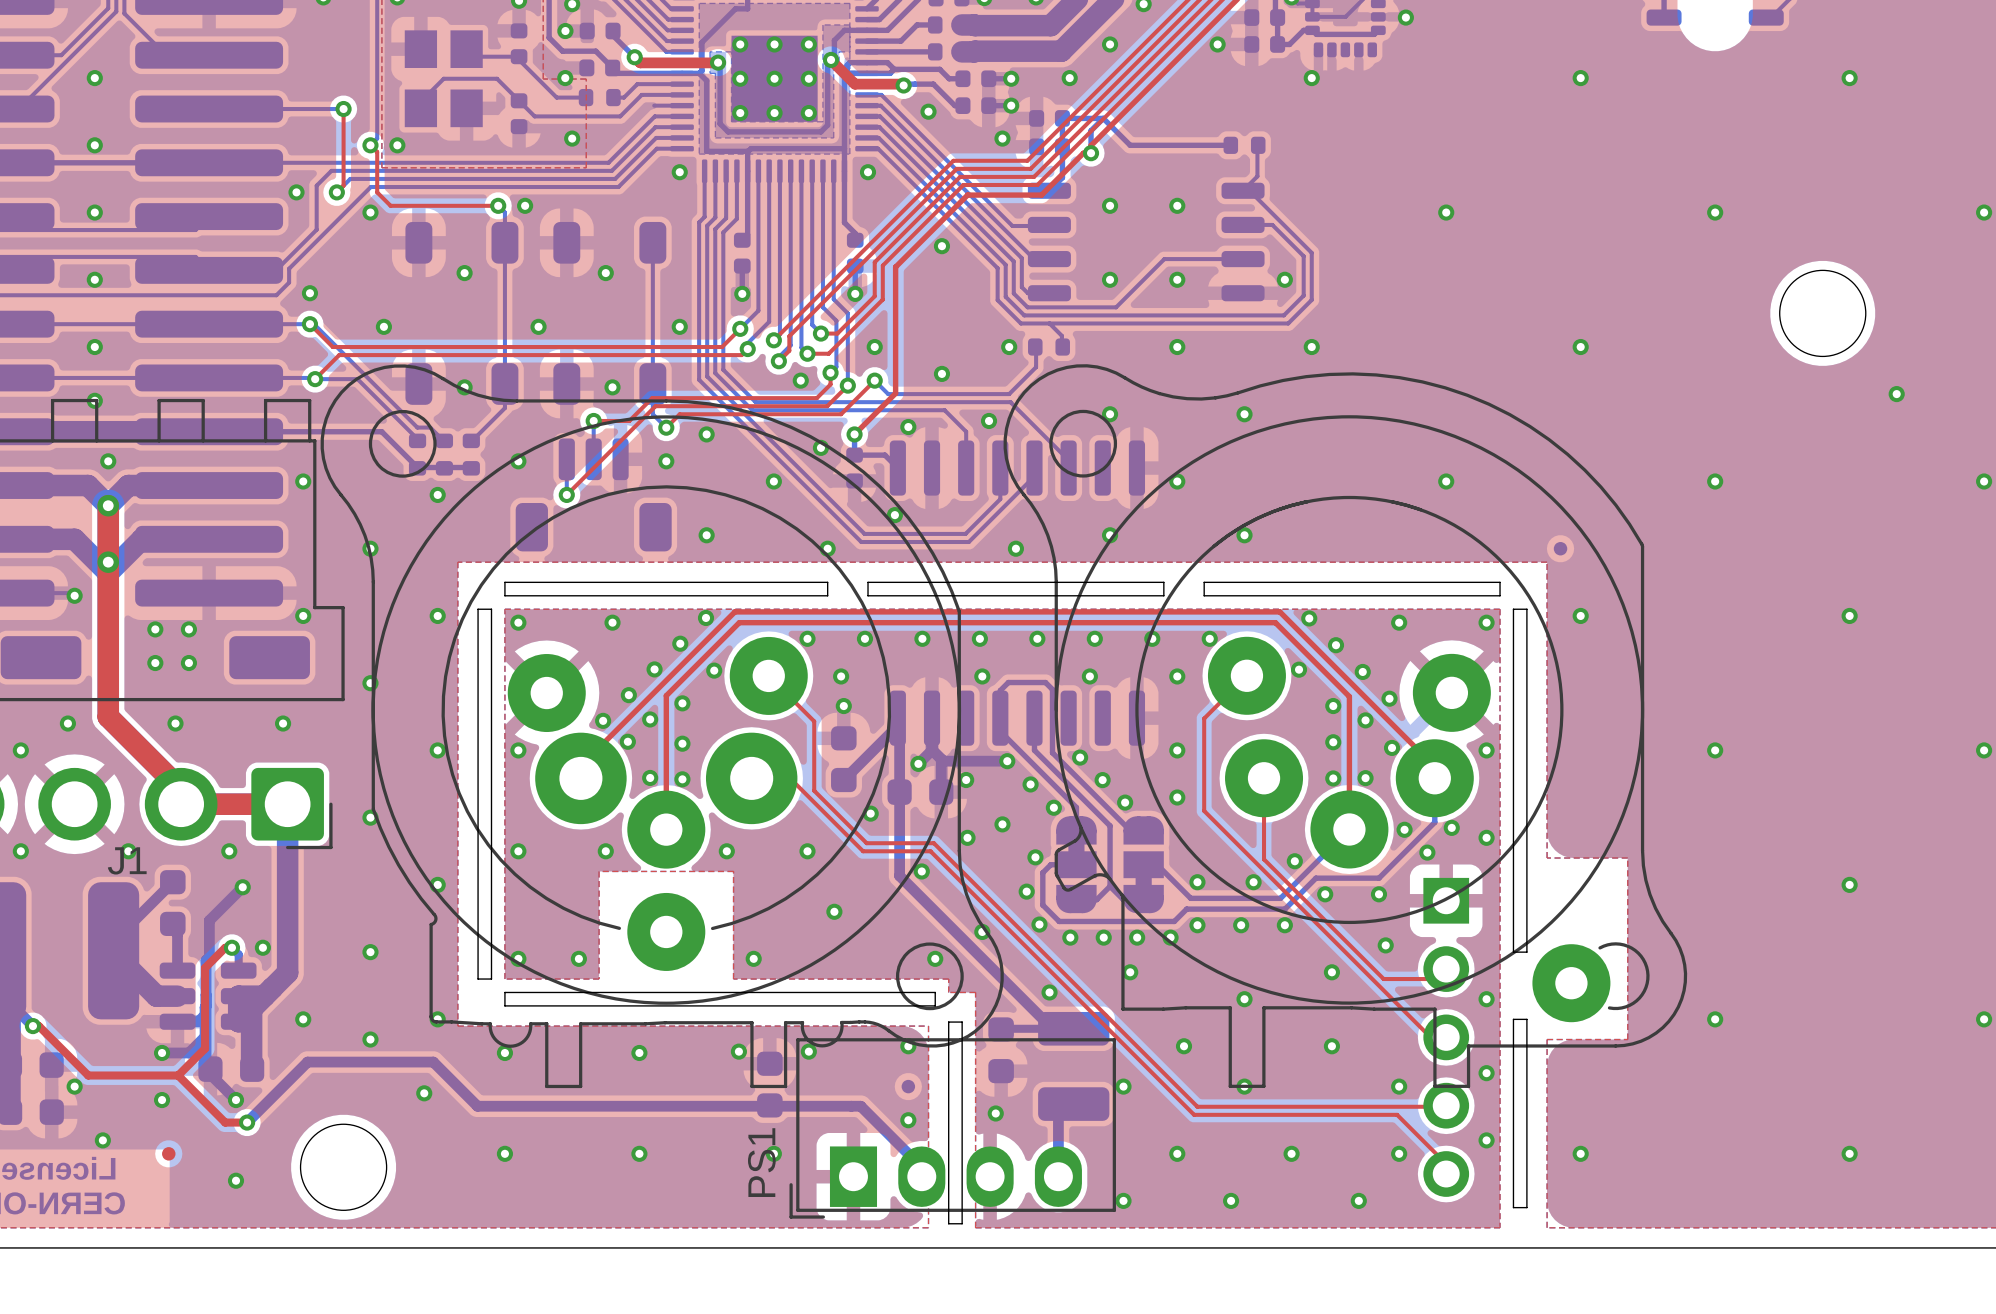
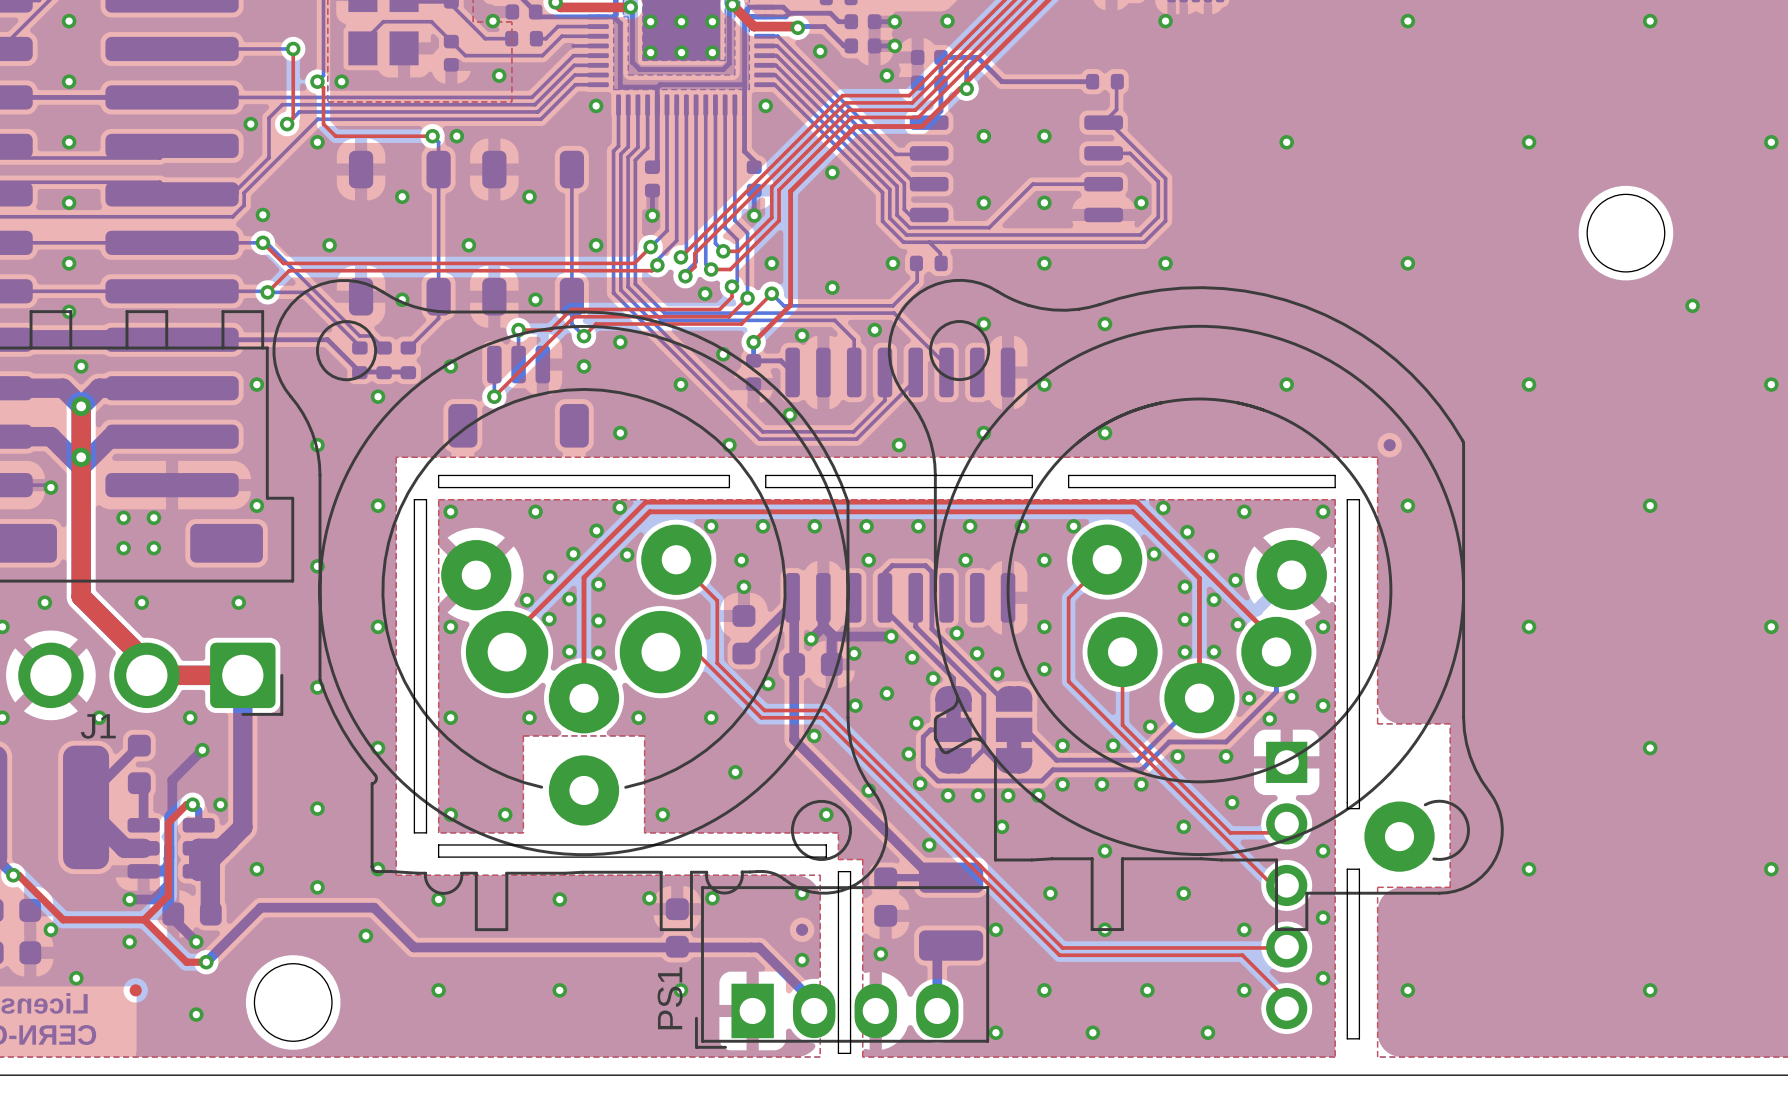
top zone outline: (948, 992) (975, 992) (975, 1008) -> (838, 844) (838, 859) (862, 859)

